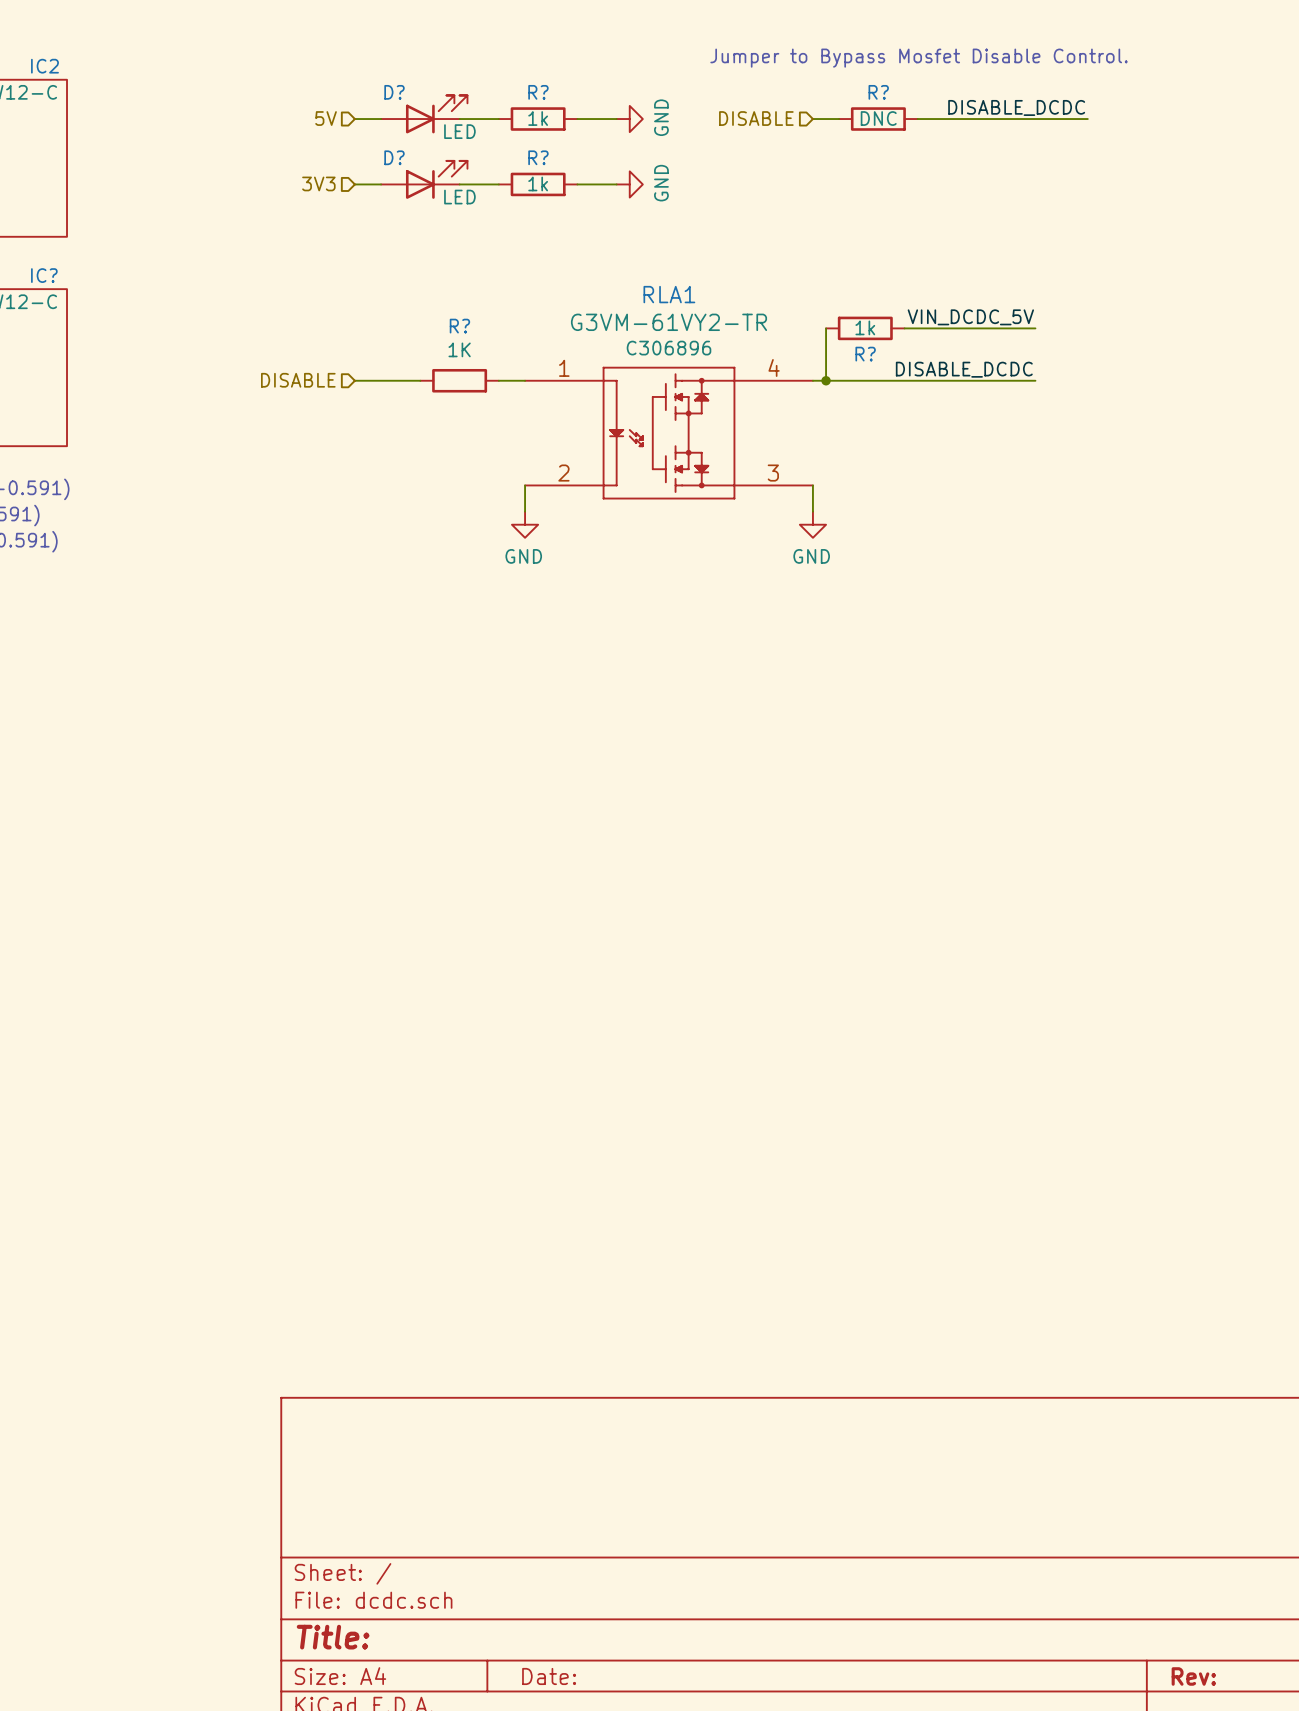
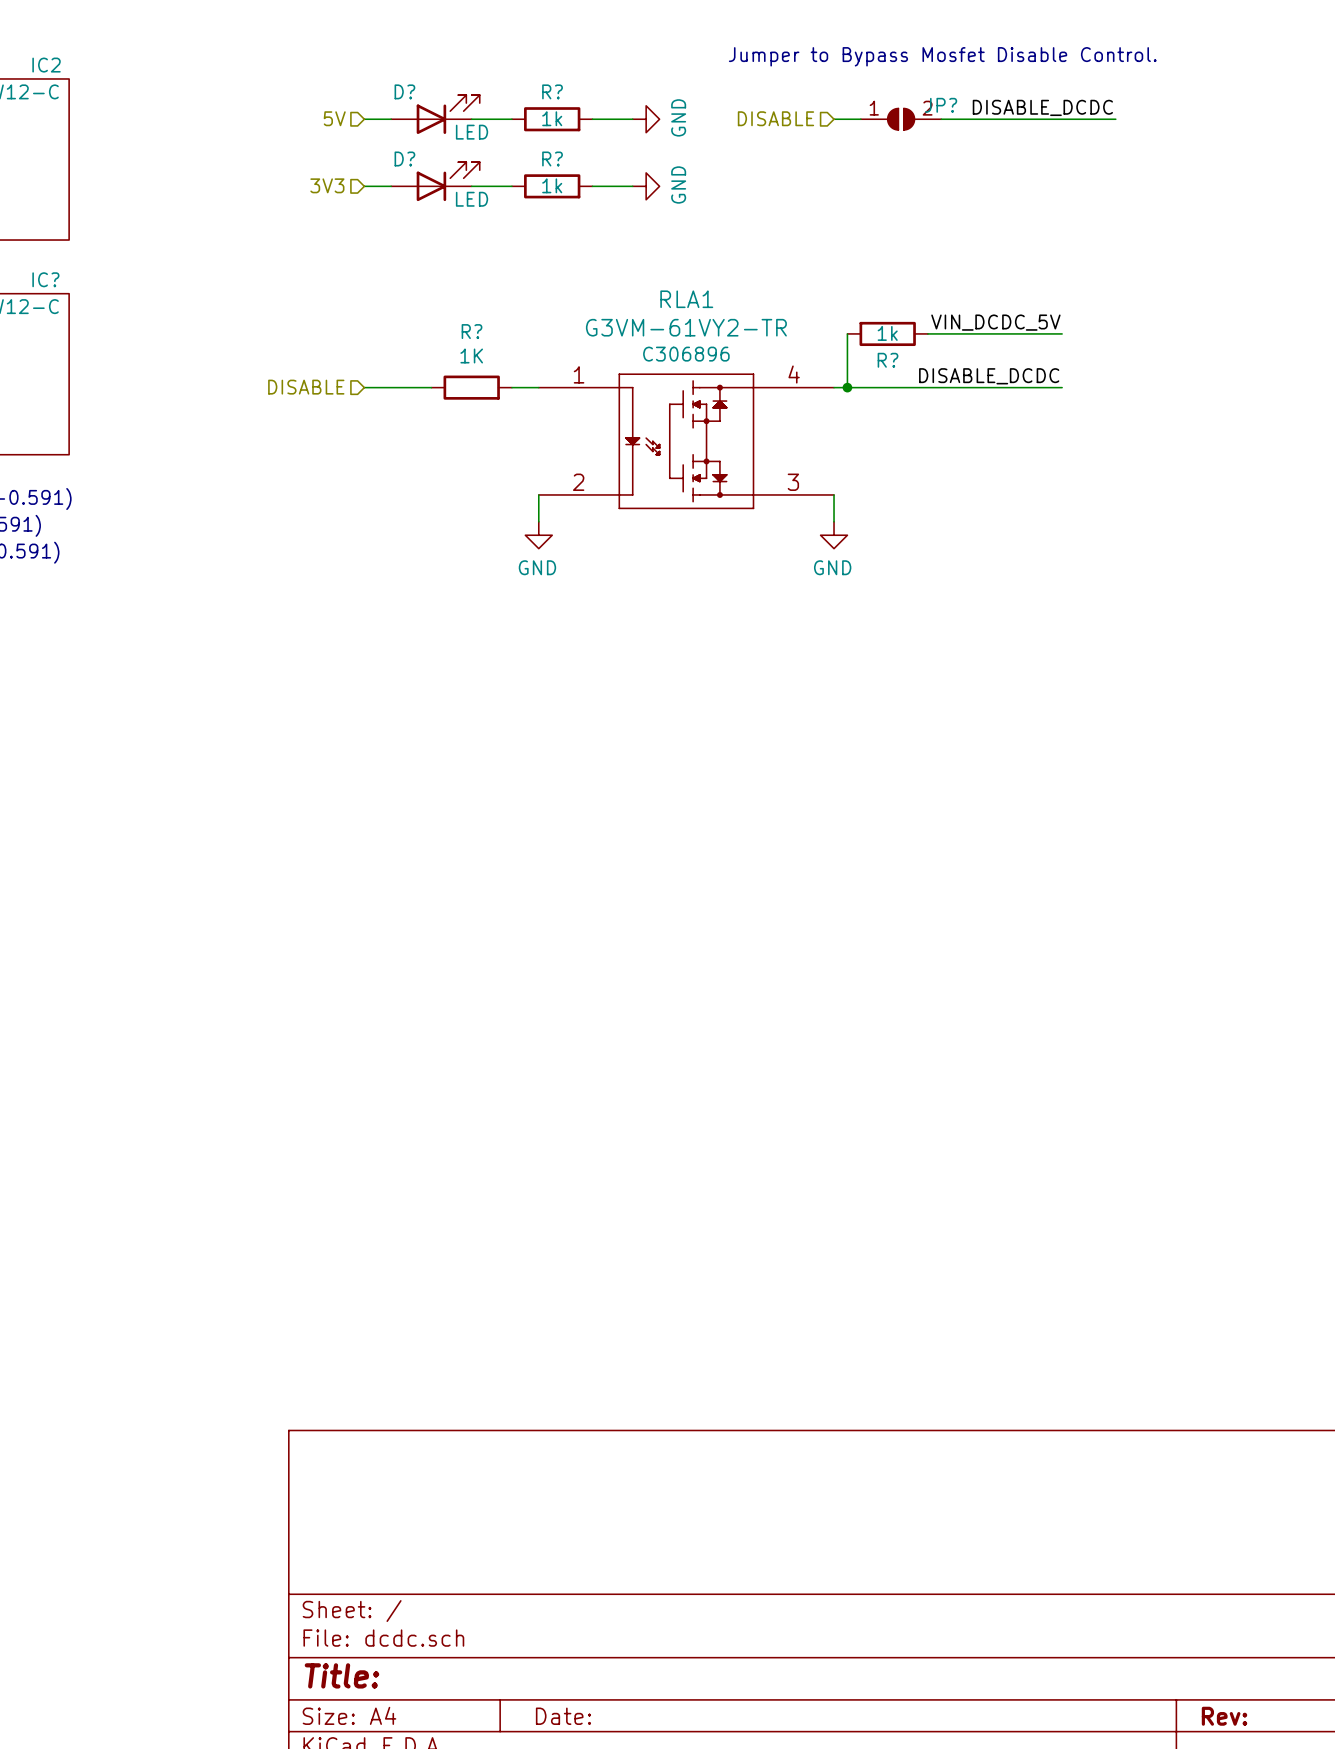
R?: DNC (878, 119) -> none
JP?: none -> (901, 119)

